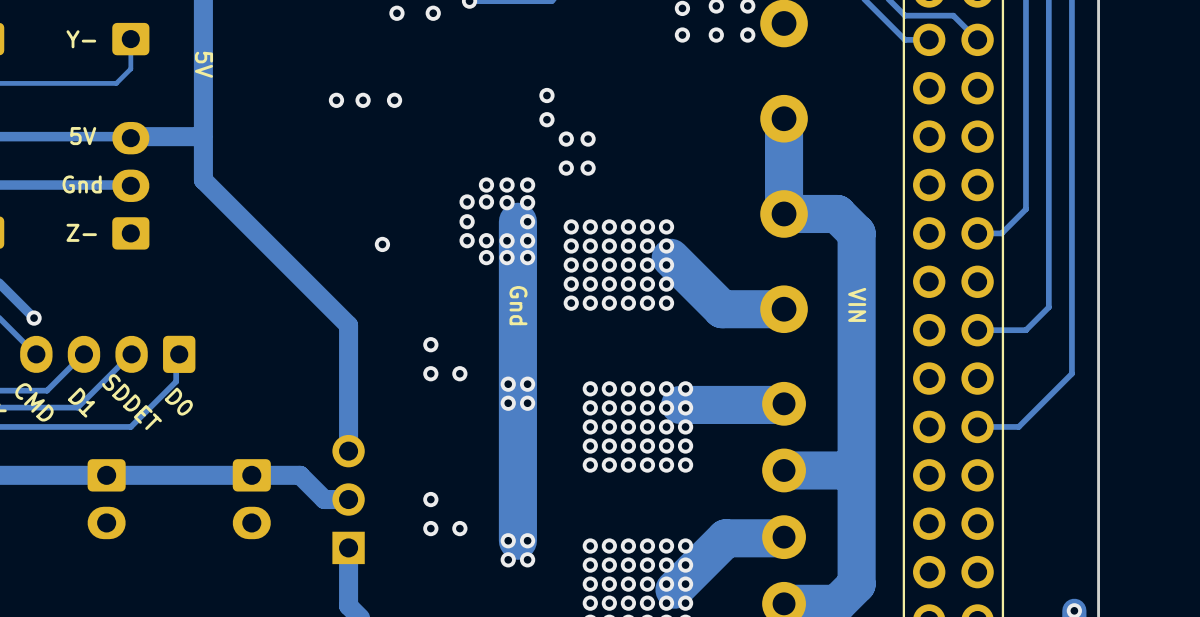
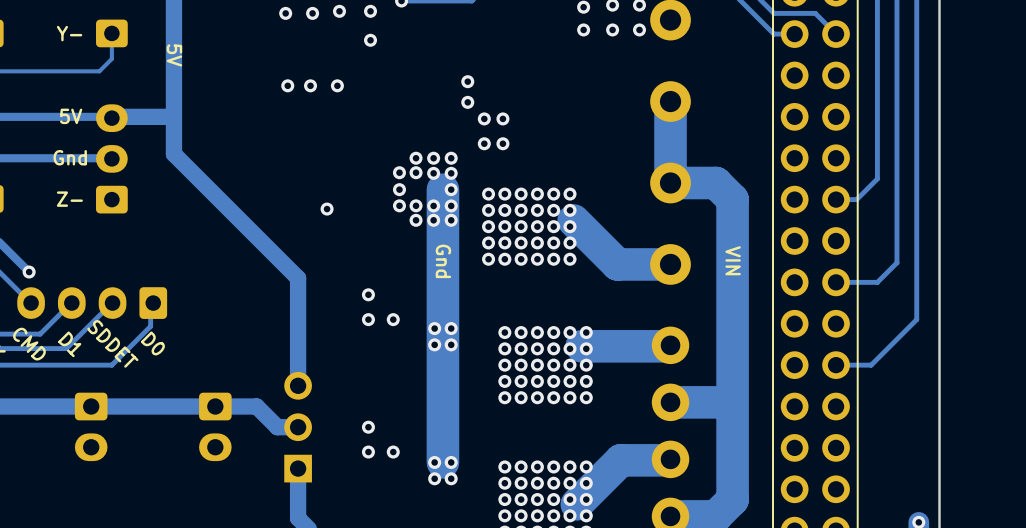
via: none -> (285, 13)
via: none -> (312, 13)
via: none -> (370, 40)

